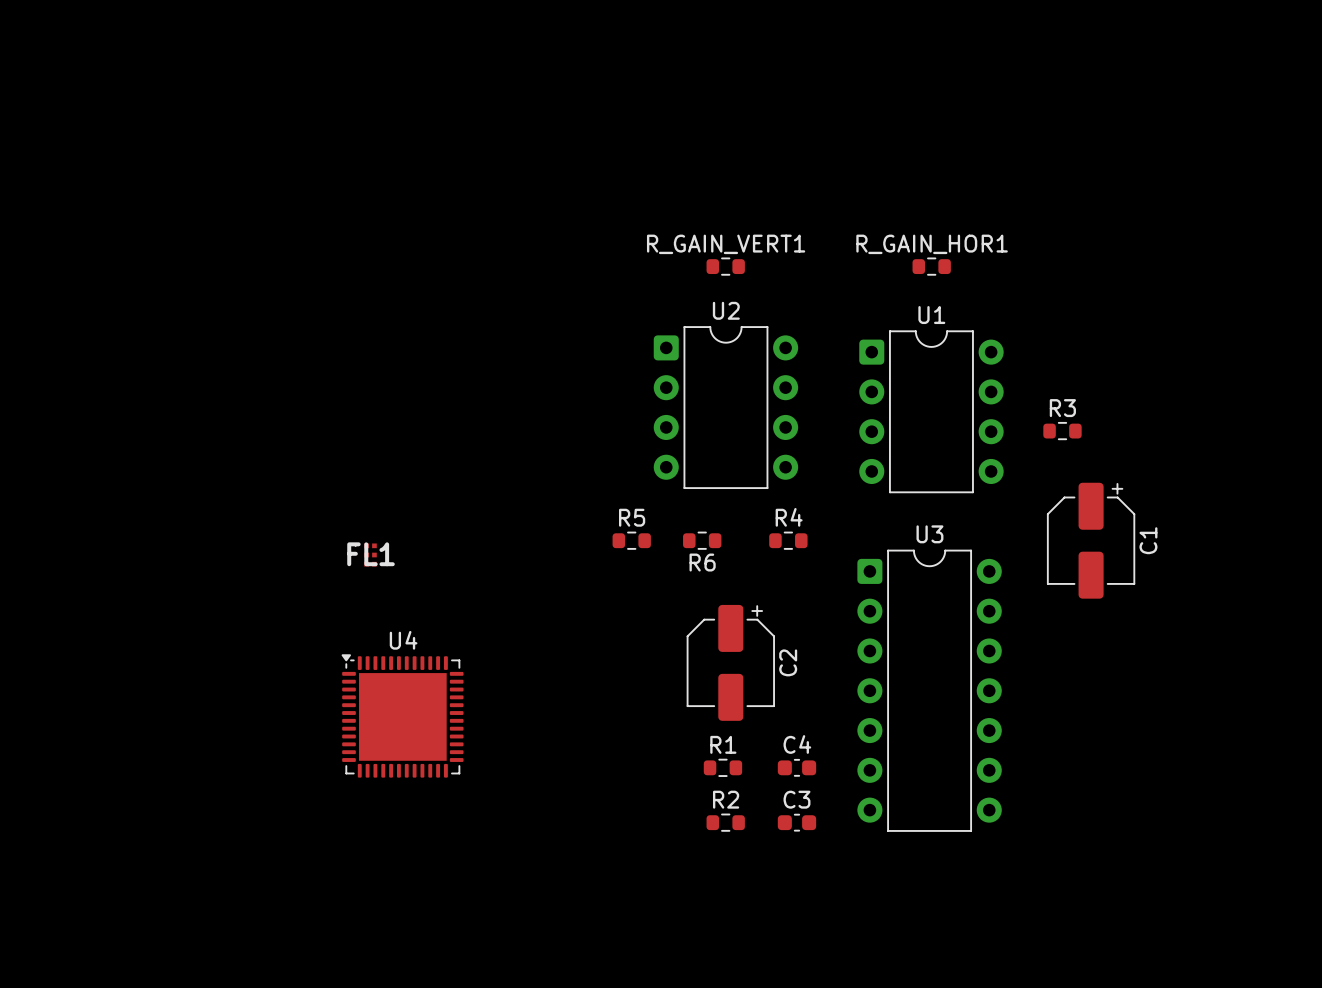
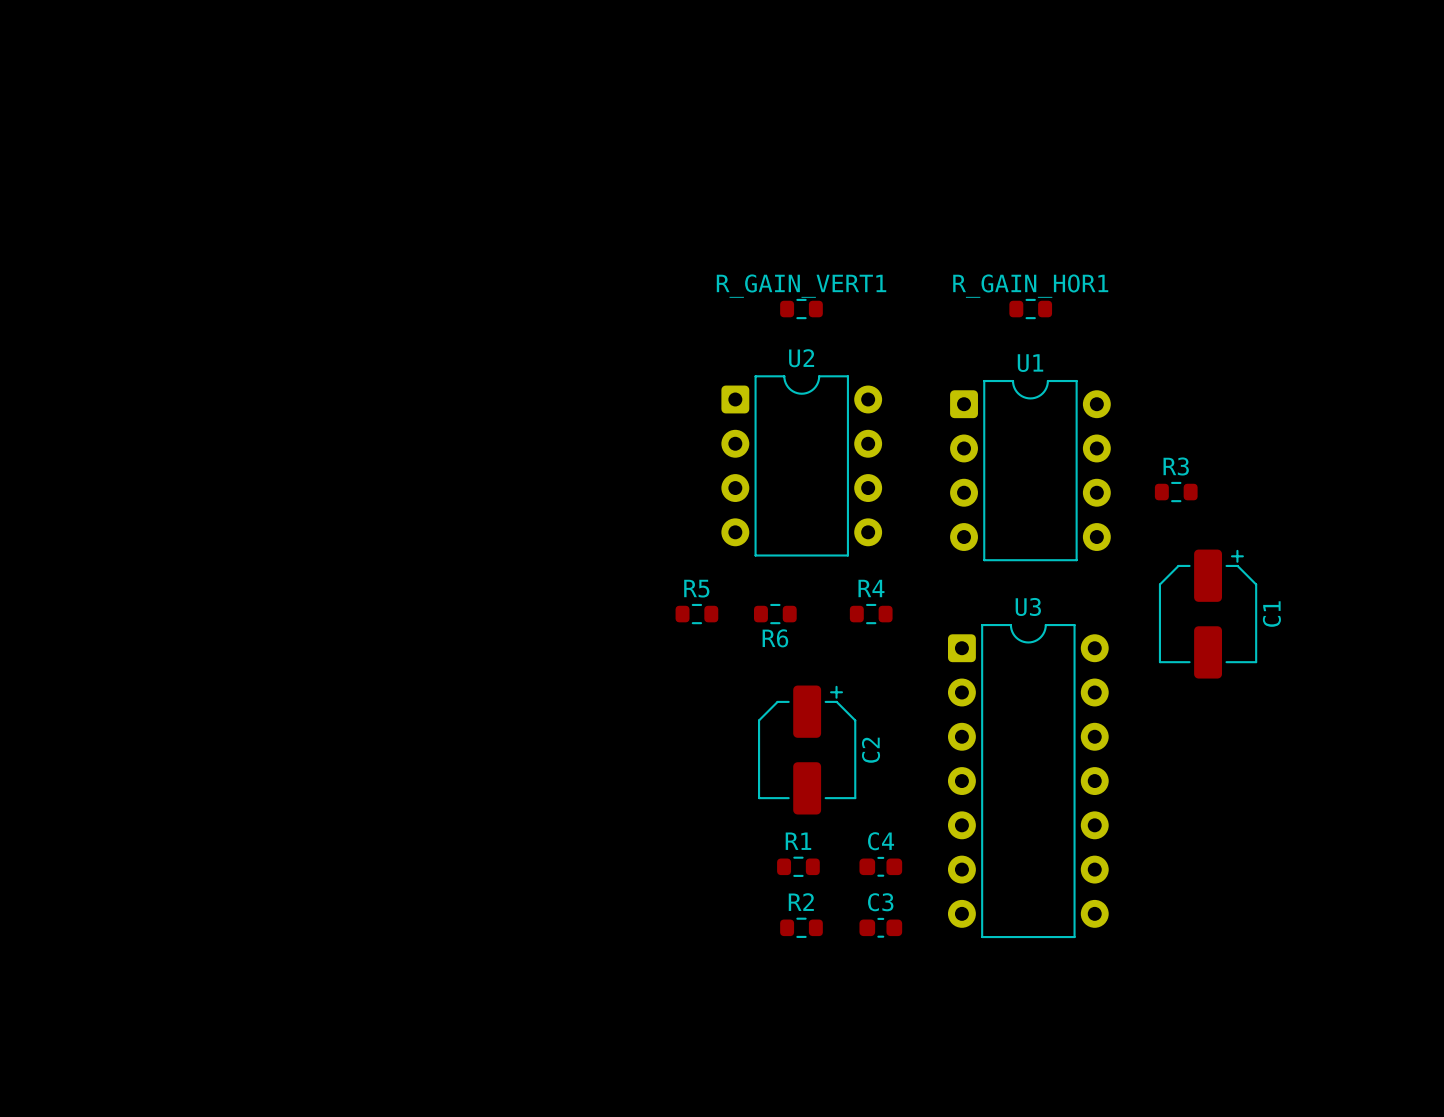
FL1: (365, 554) -> none
U4: (402, 715) -> none

